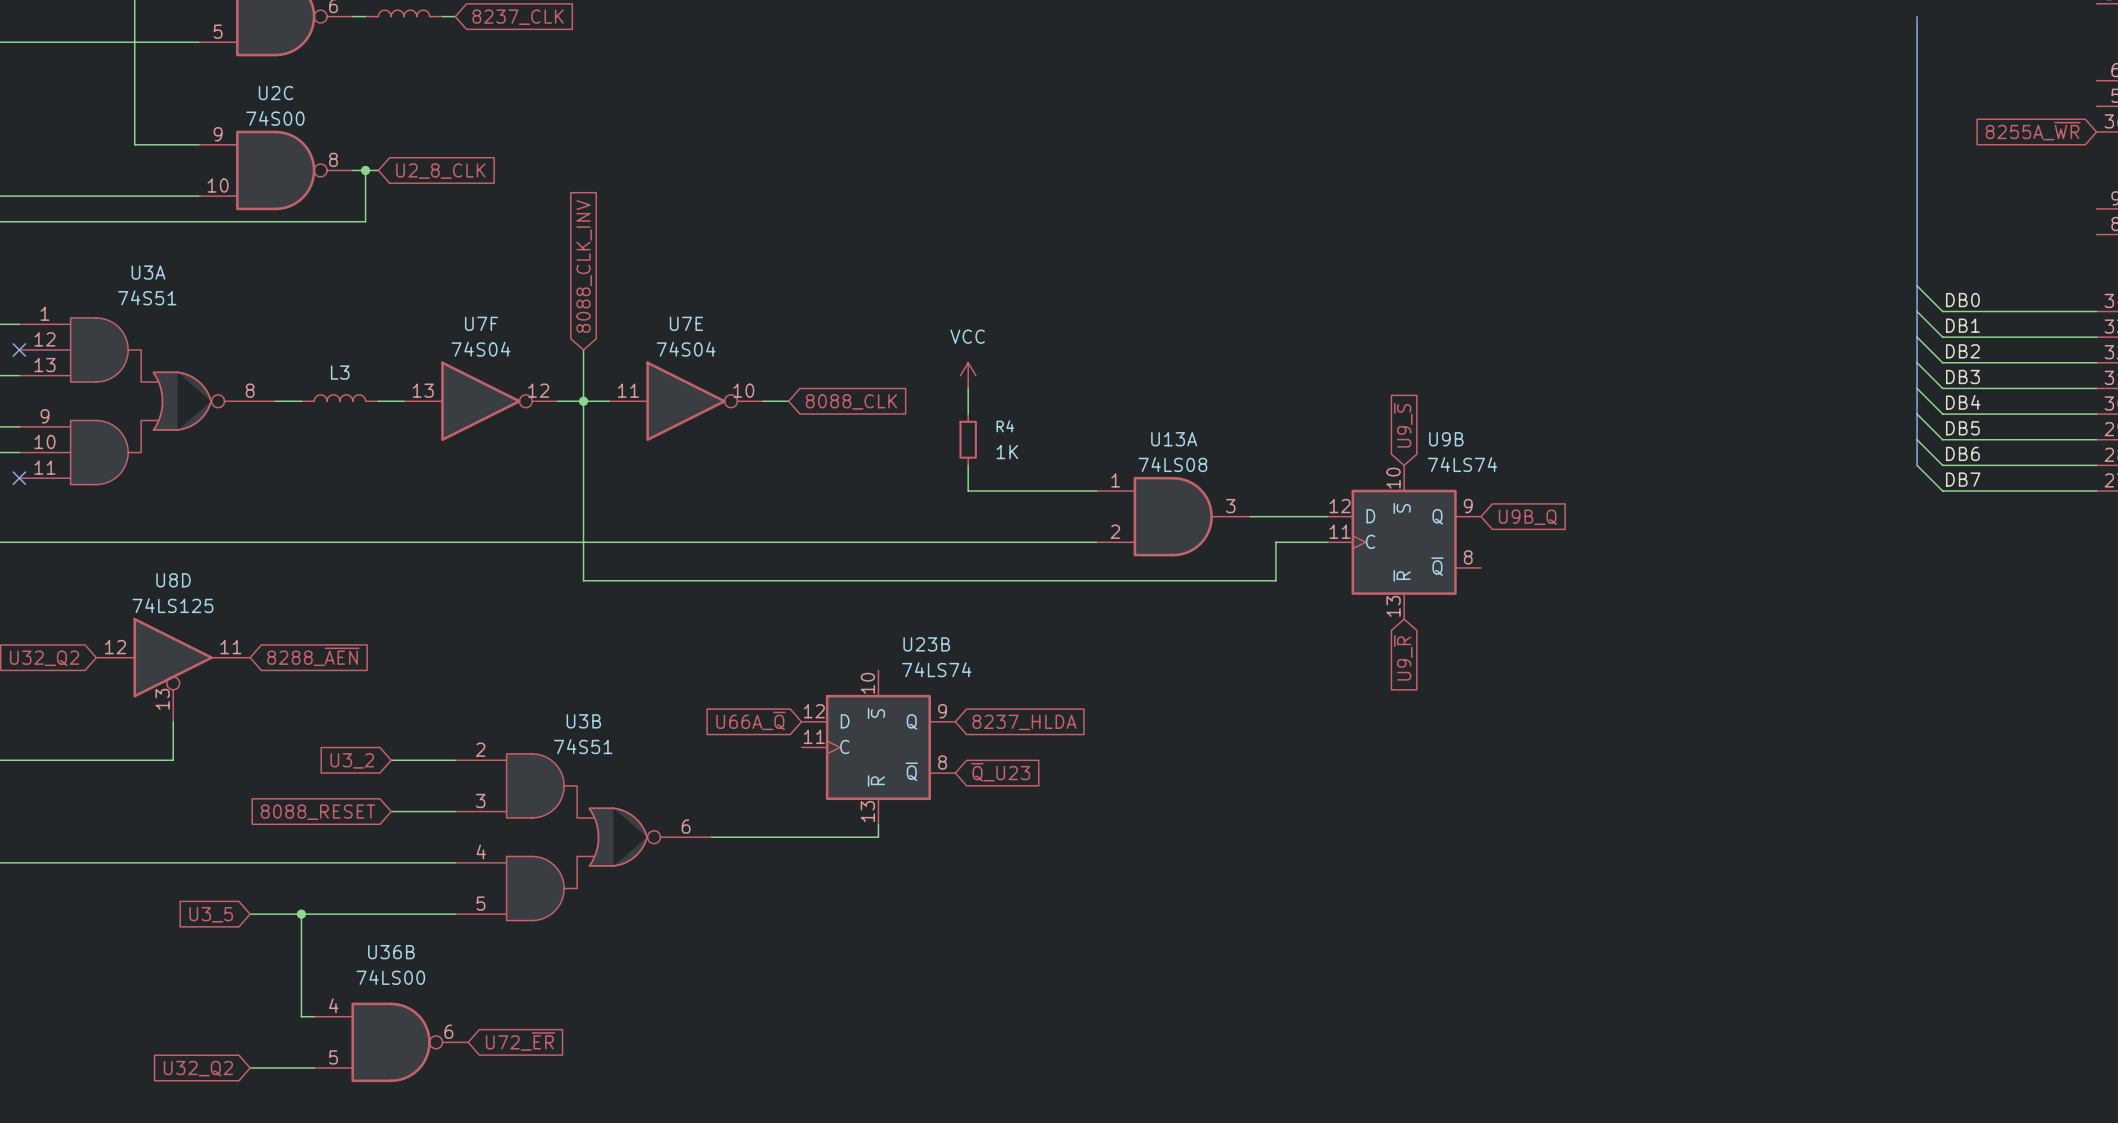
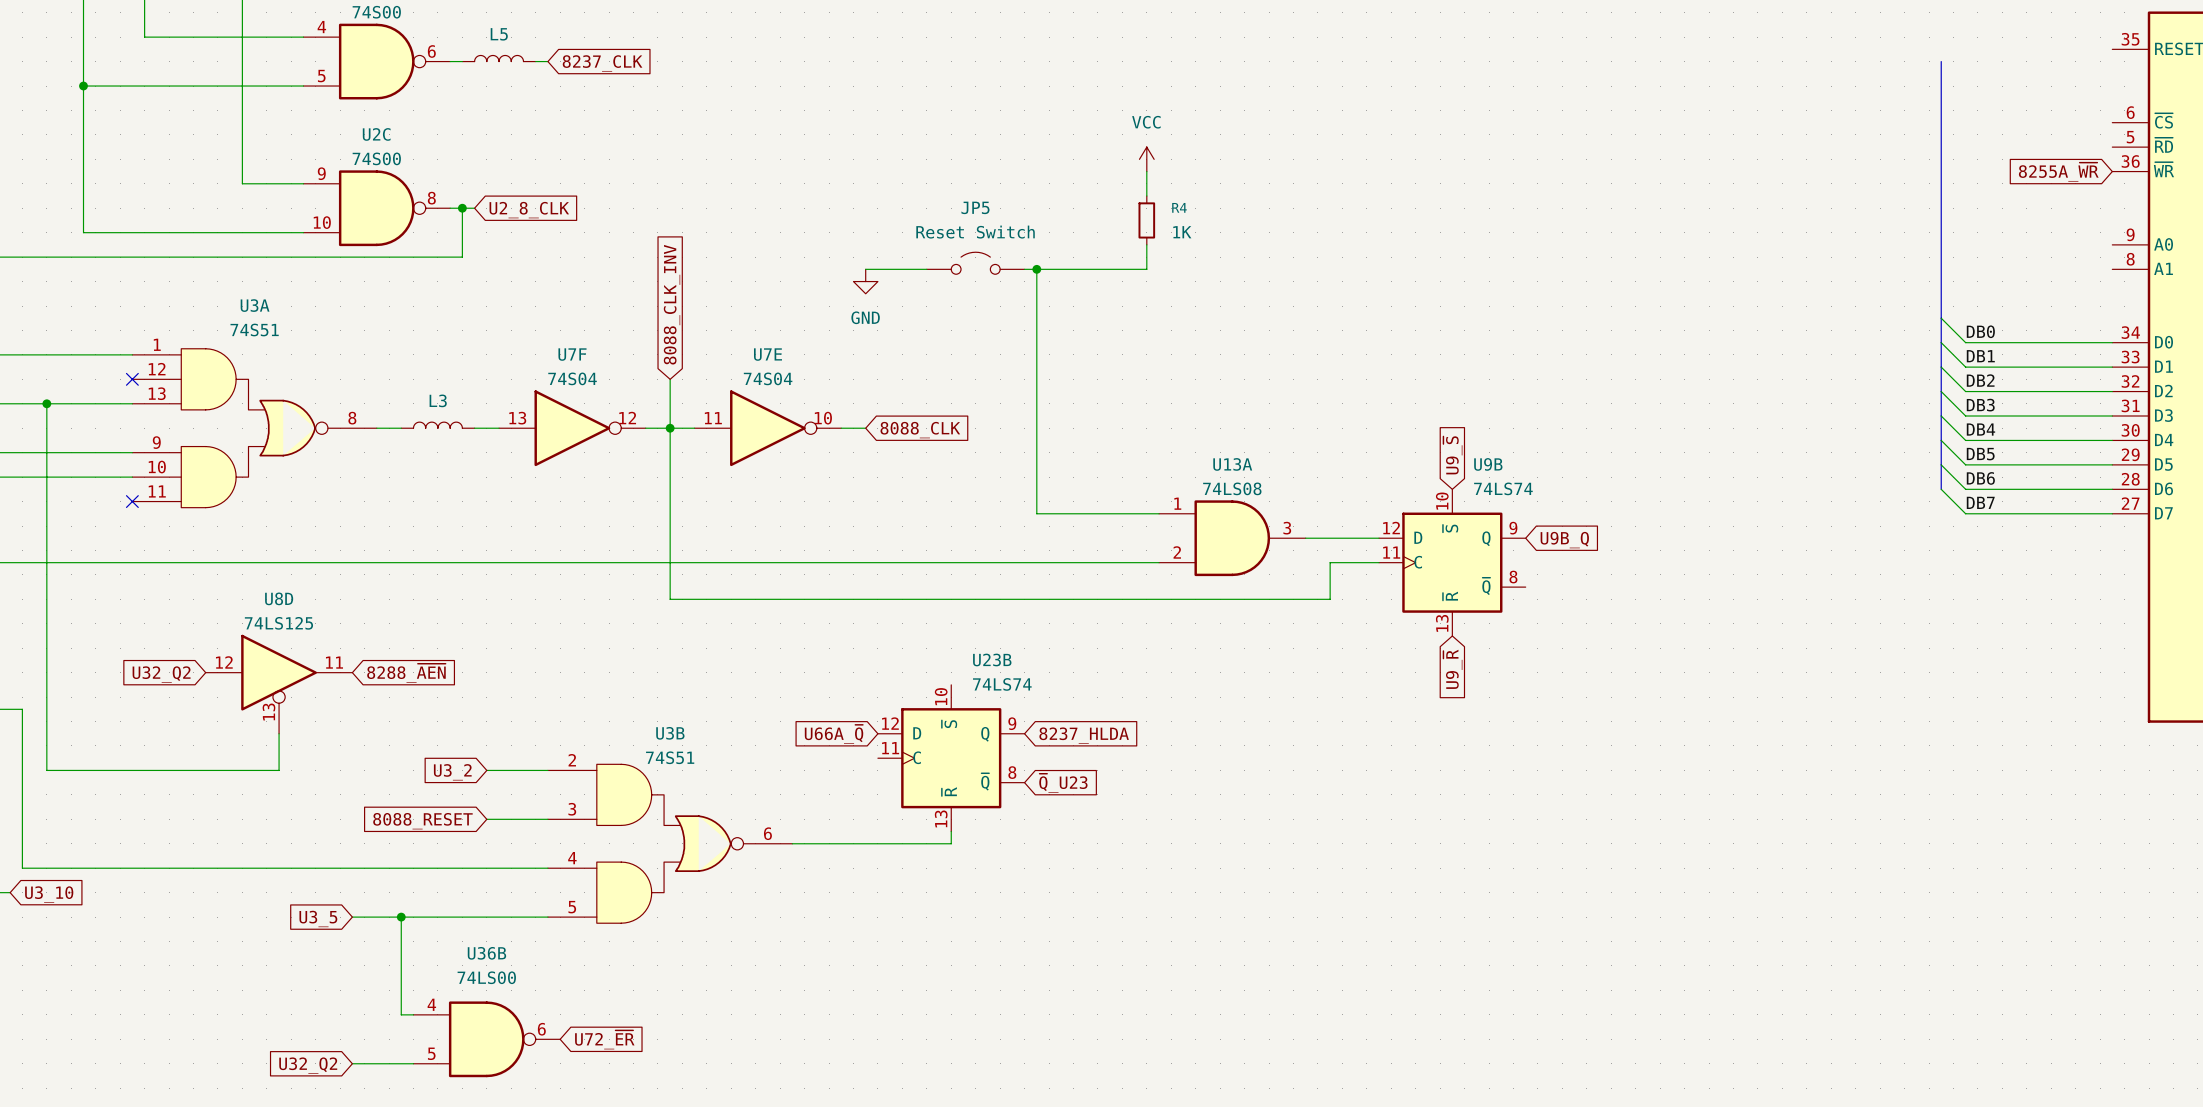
power symbol: none -> VCC (1146, 159)
wire: none -> (1146, 171) (1146, 196)
wire: none -> (1146, 244) (1146, 269) (1024, 269)
JP5: none -> Reset Switch (975, 263)
wire: none -> (865, 269) (926, 269)
wire: none -> (1036, 269) (1036, 416)
junction: none -> (1036, 269)
power symbol: none -> GND (865, 281)
power symbol: VCC (968, 375) -> none
wire: none -> (1036, 440) (1036, 489)
R4 position: (968, 439) -> (1146, 220)

